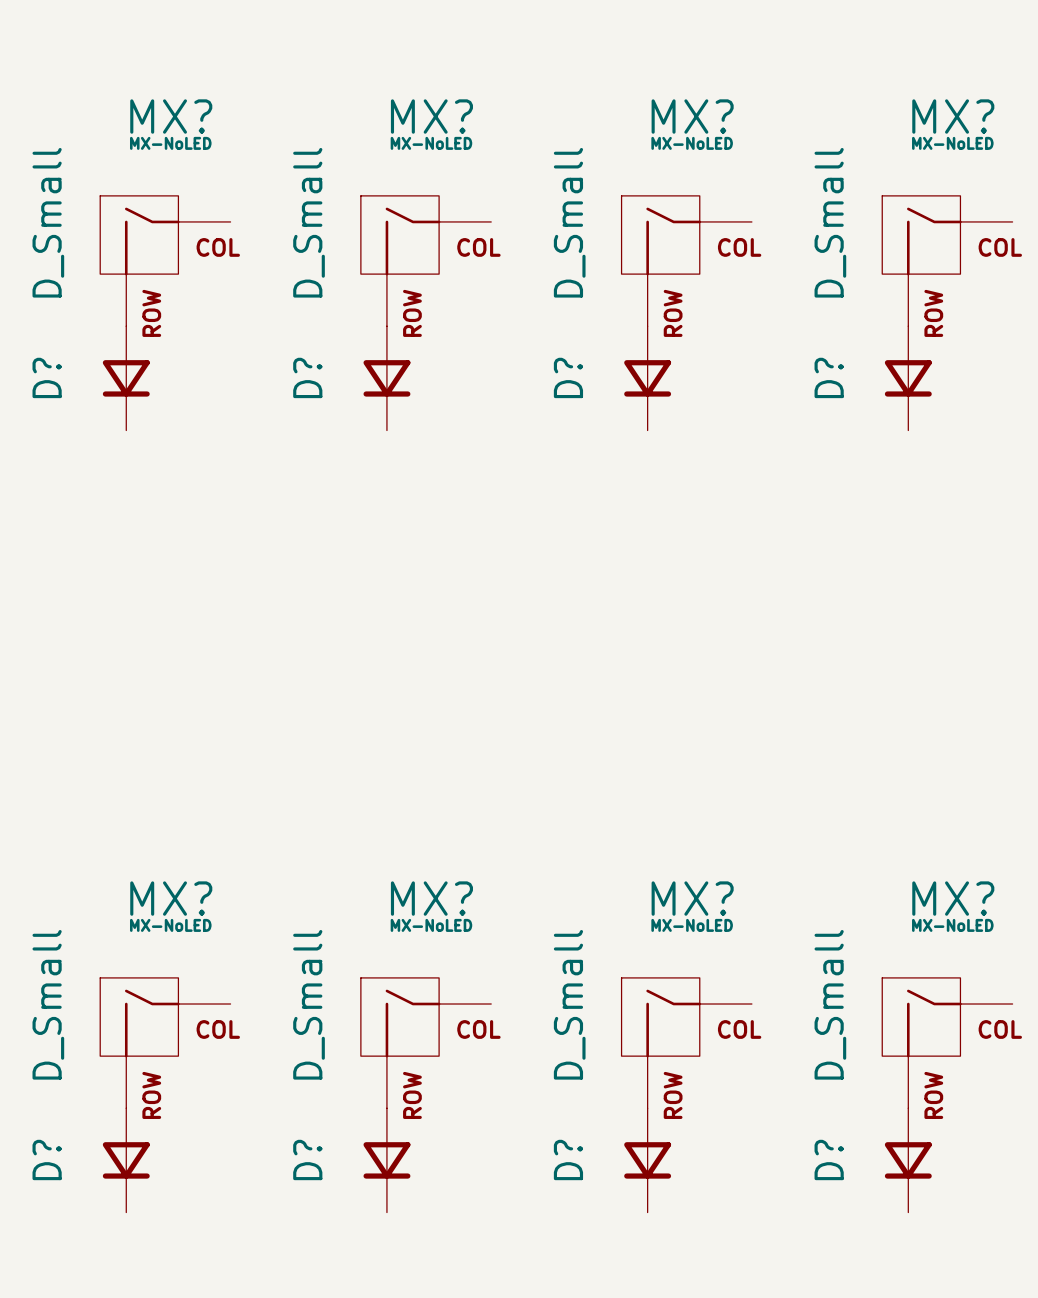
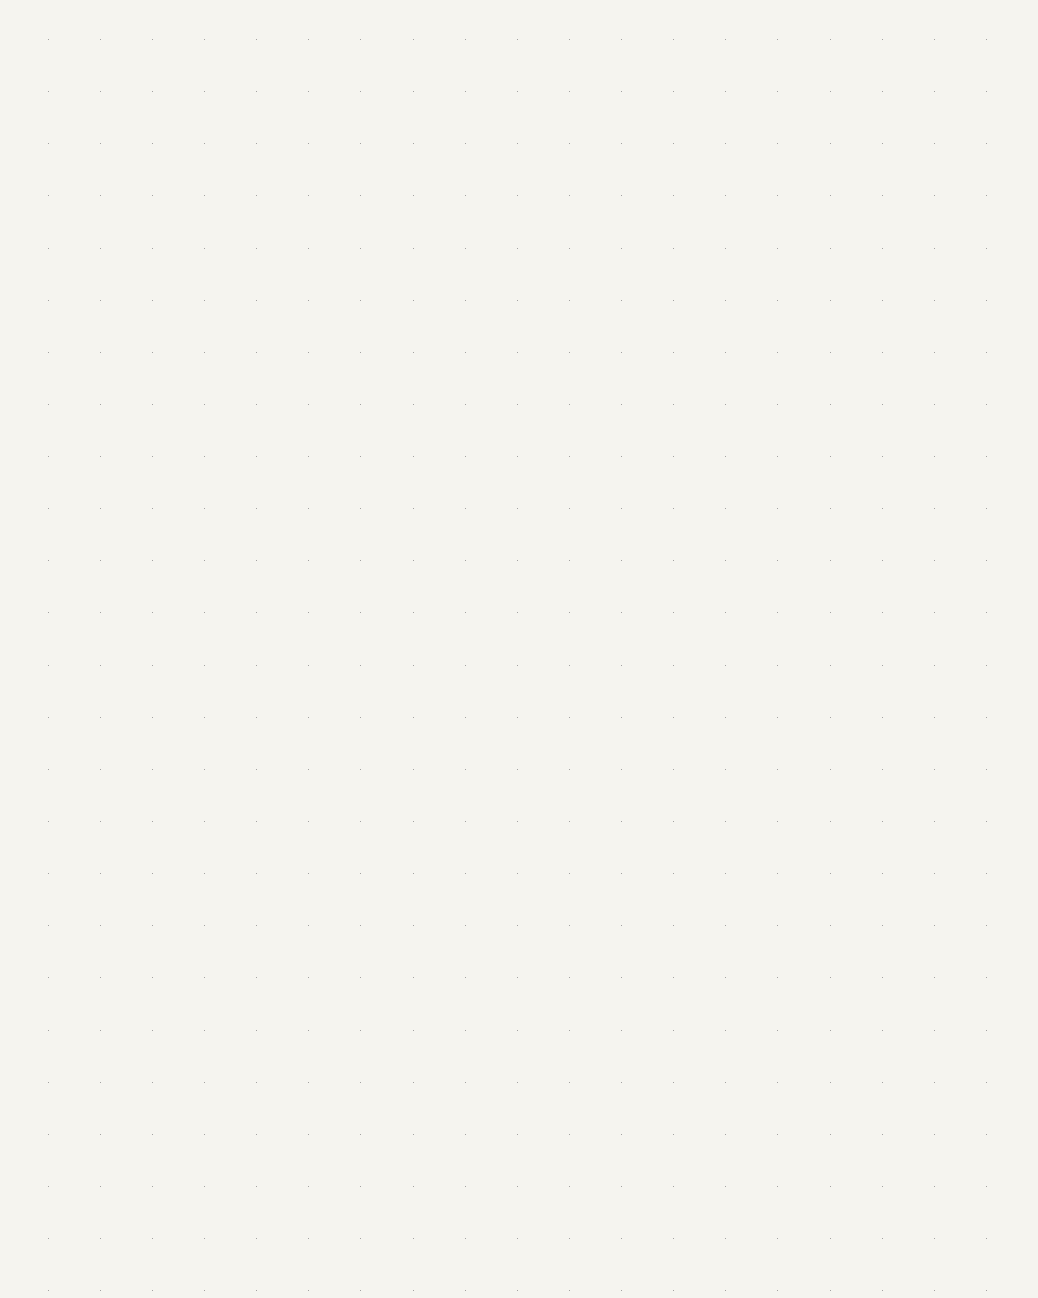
MX?: MX-NoLED (165, 261) -> none
MX?: MX-NoLED (426, 261) -> none
MX?: MX-NoLED (686, 261) -> none
MX?: MX-NoLED (947, 261) -> none
D?: D_Small (126, 378) -> none
D?: D_Small (386, 378) -> none
D?: D_Small (647, 378) -> none
D?: D_Small (908, 378) -> none
MX?: MX-NoLED (165, 1043) -> none
MX?: MX-NoLED (426, 1043) -> none
MX?: MX-NoLED (686, 1043) -> none
MX?: MX-NoLED (947, 1043) -> none
D?: D_Small (126, 1160) -> none
D?: D_Small (386, 1160) -> none
D?: D_Small (647, 1160) -> none
D?: D_Small (908, 1160) -> none

